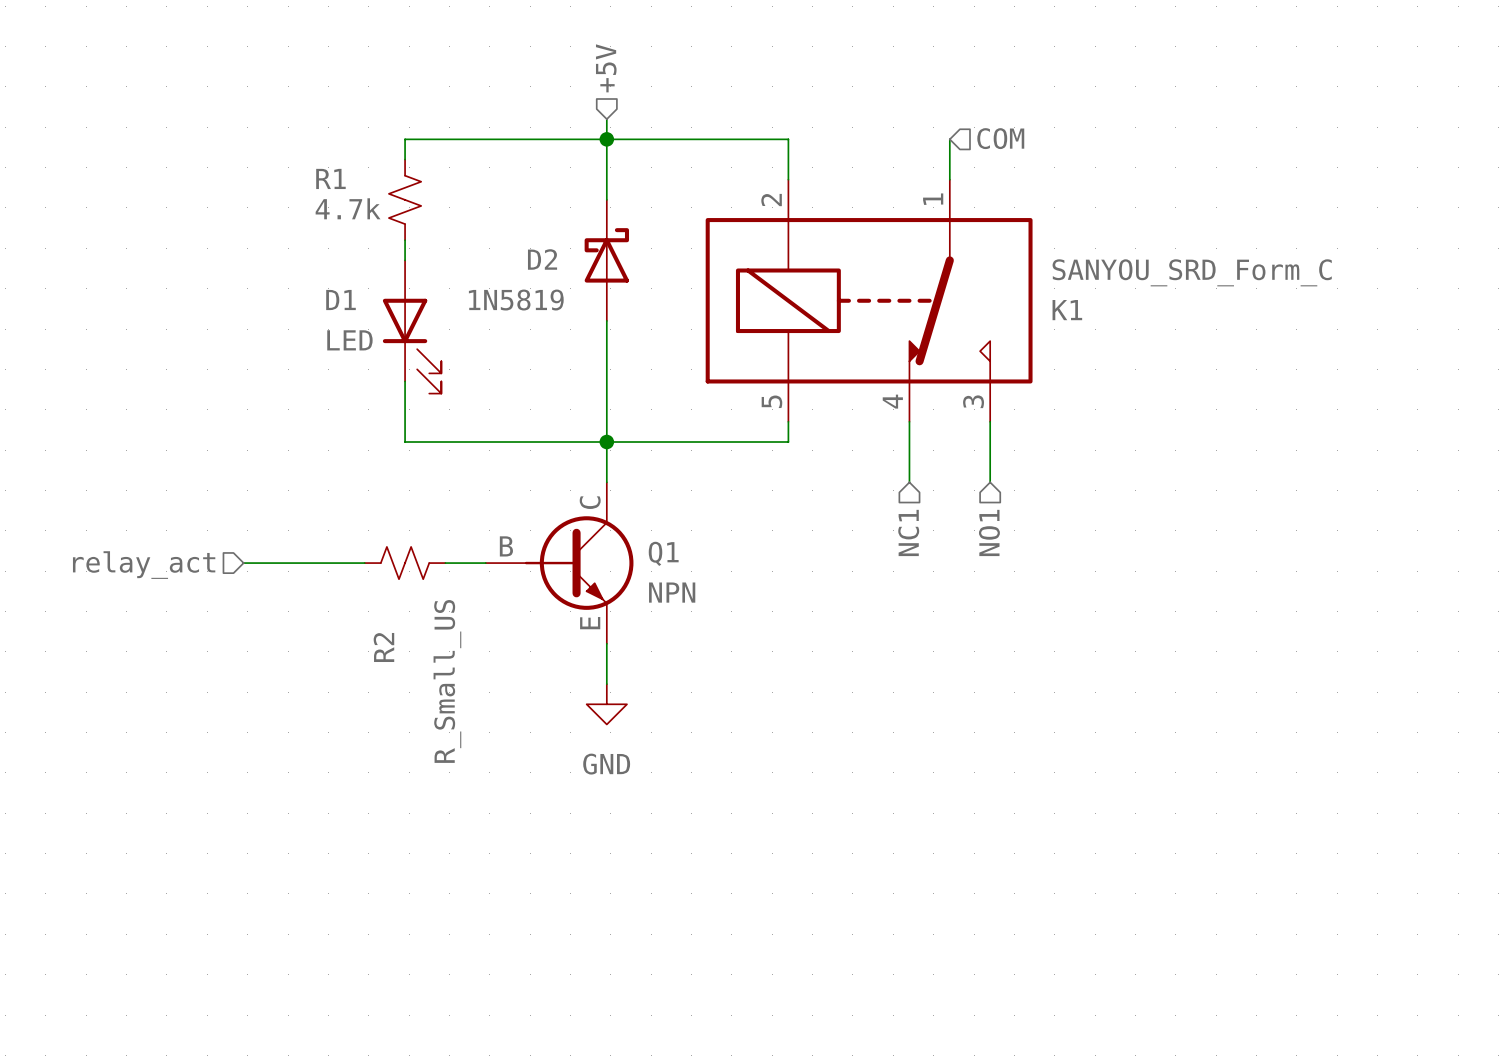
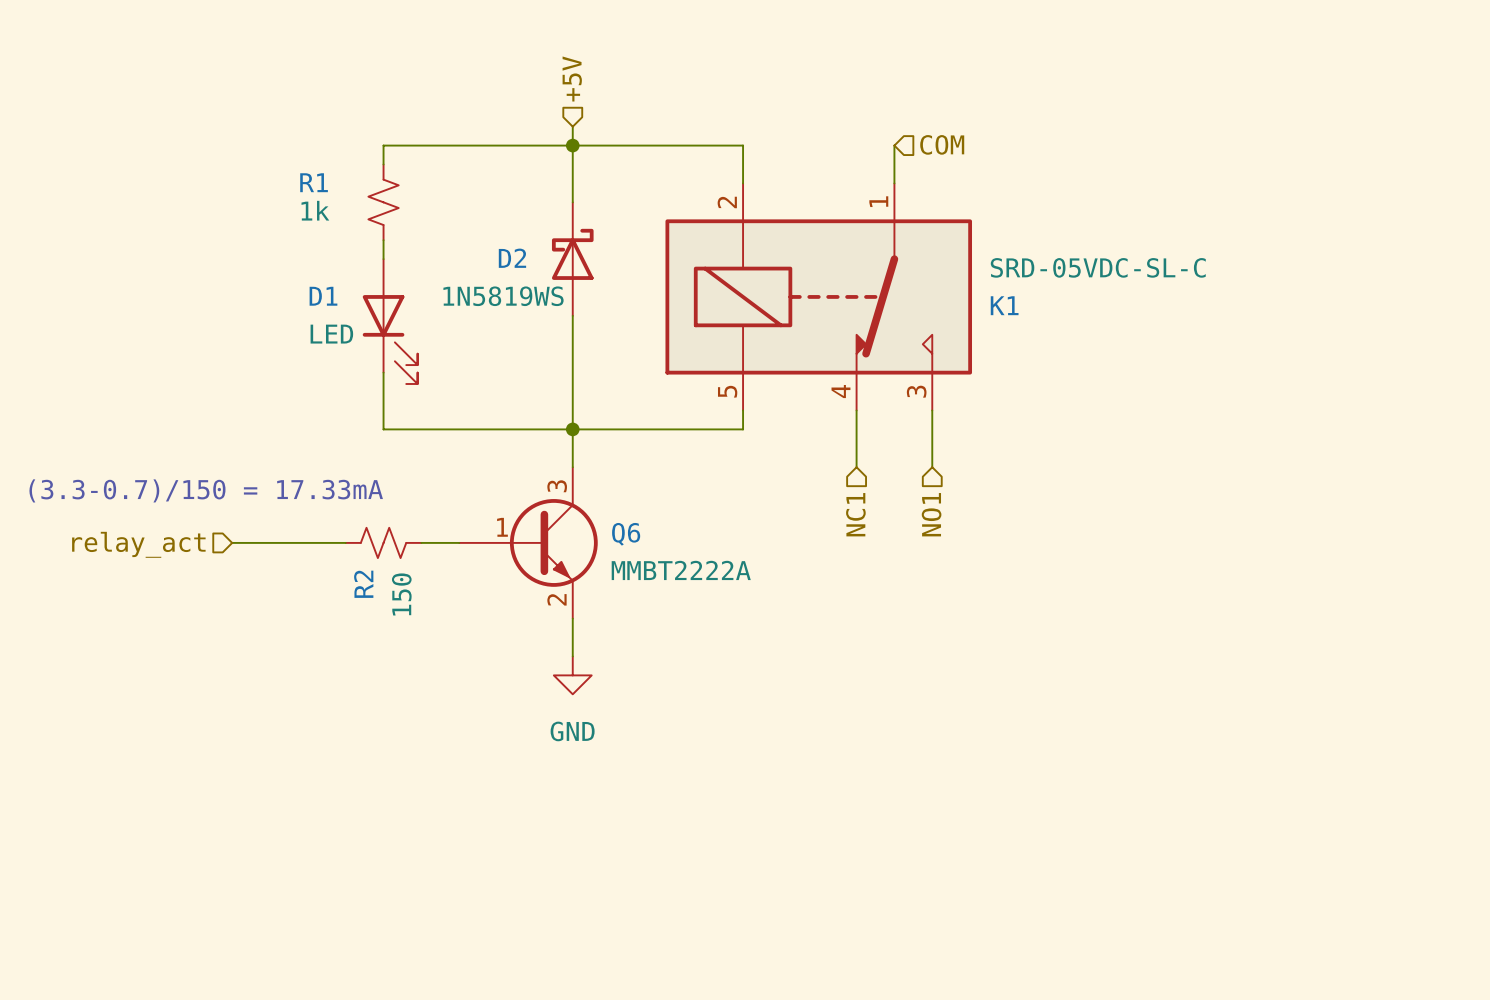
R1 value: 4.7k (348, 208) -> 1k (315, 210)
K1 value: SANYOU_SRD_Form_C (1192, 272) -> SRD-05VDC-SL-C (1098, 267)
D2 value: 1N5819 (516, 300) -> 1N5819WS (503, 296)
text: none -> (3.3-0.7)/150 = 17.33mA (206, 490)
Q1: NPN (559, 563) -> none
Q6: none -> MMBT2222A (528, 542)
R2 name position: R2 (383, 647) -> R2 (363, 584)
R2 value: R_Small_US (447, 681) -> 150 (401, 594)

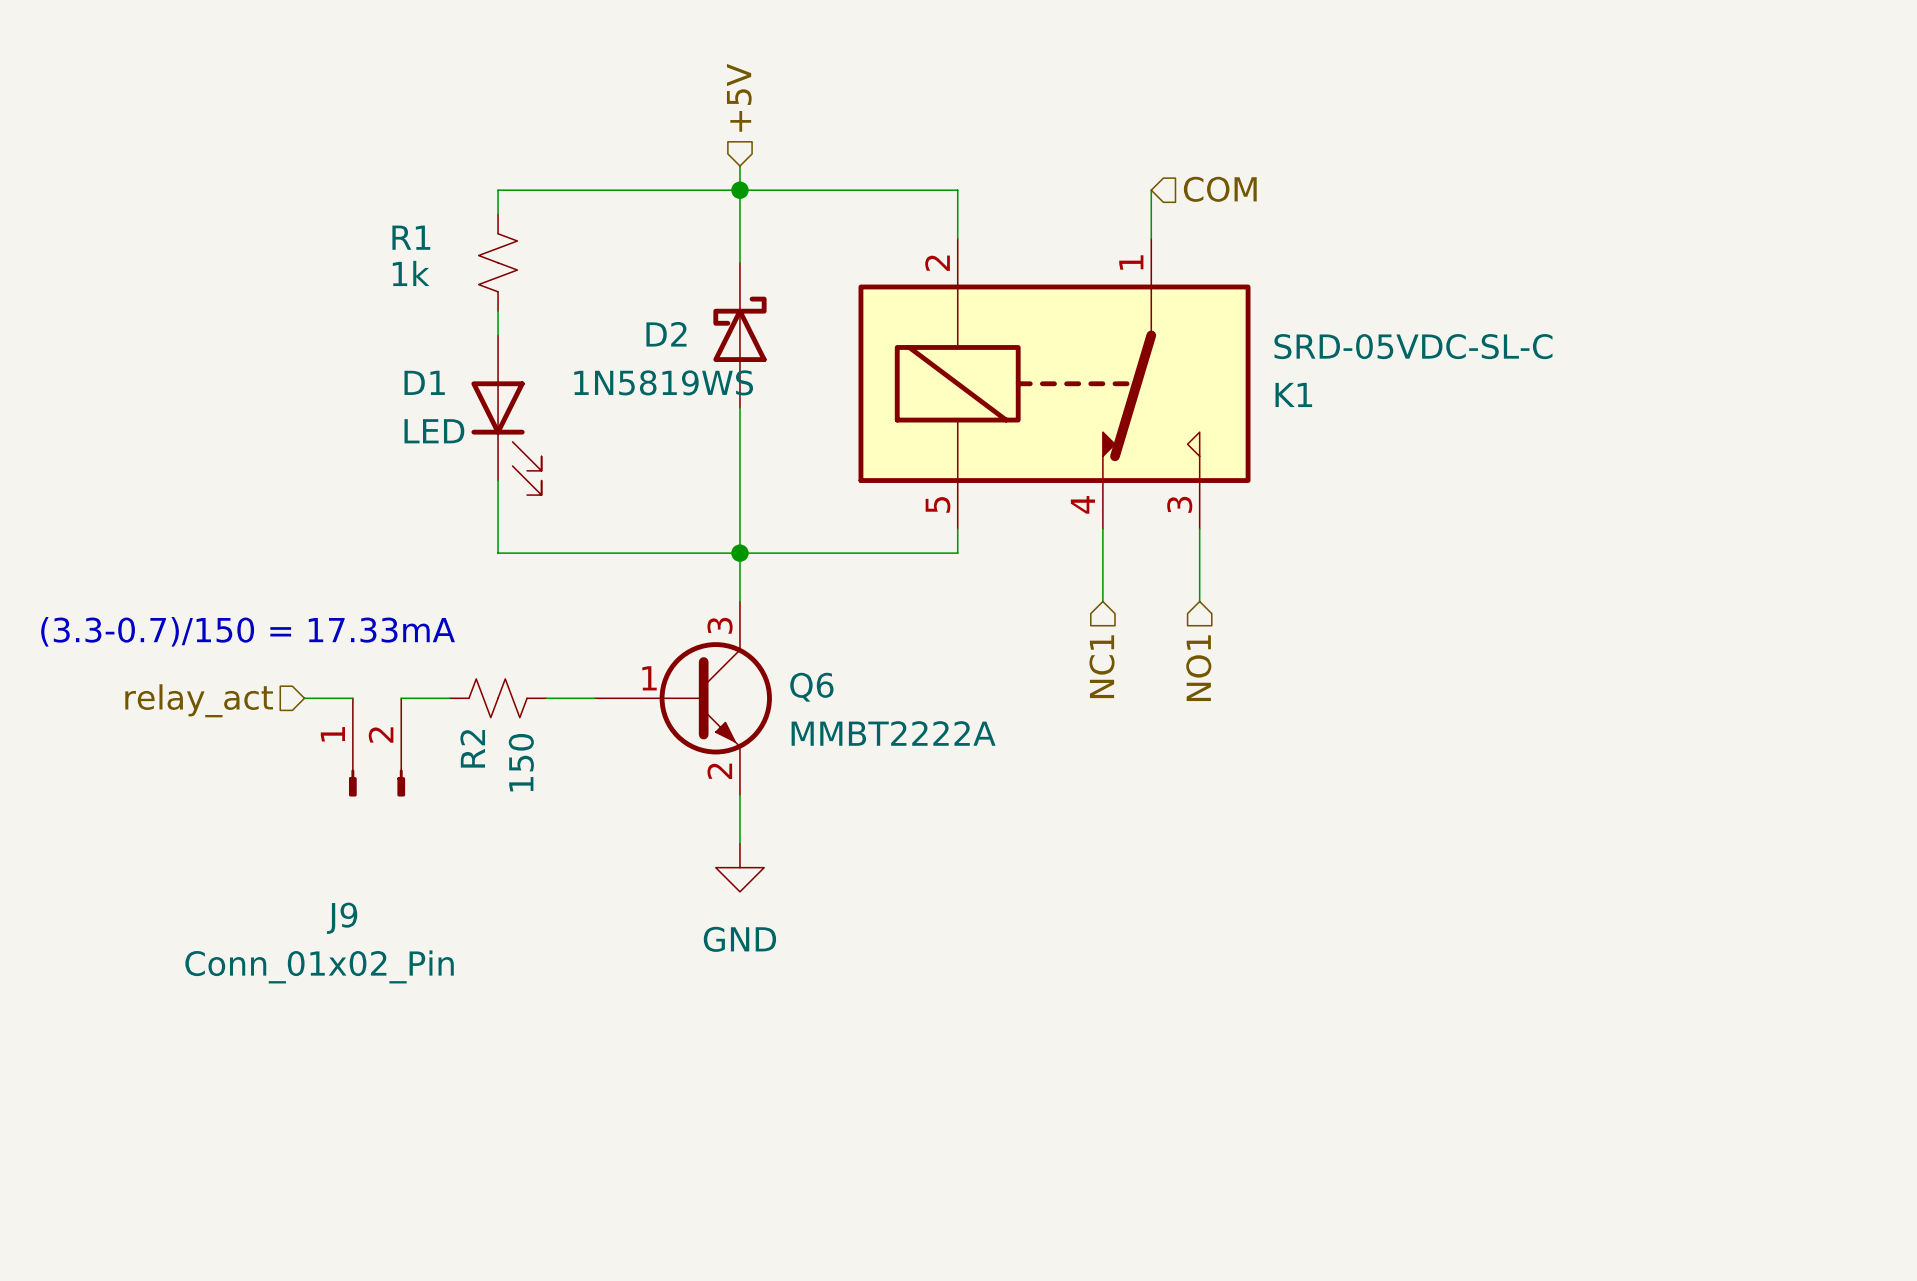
wire: (270, 542) (307, 542) -> none
J9: none -> Conn_01x02_Pin (377, 747)

